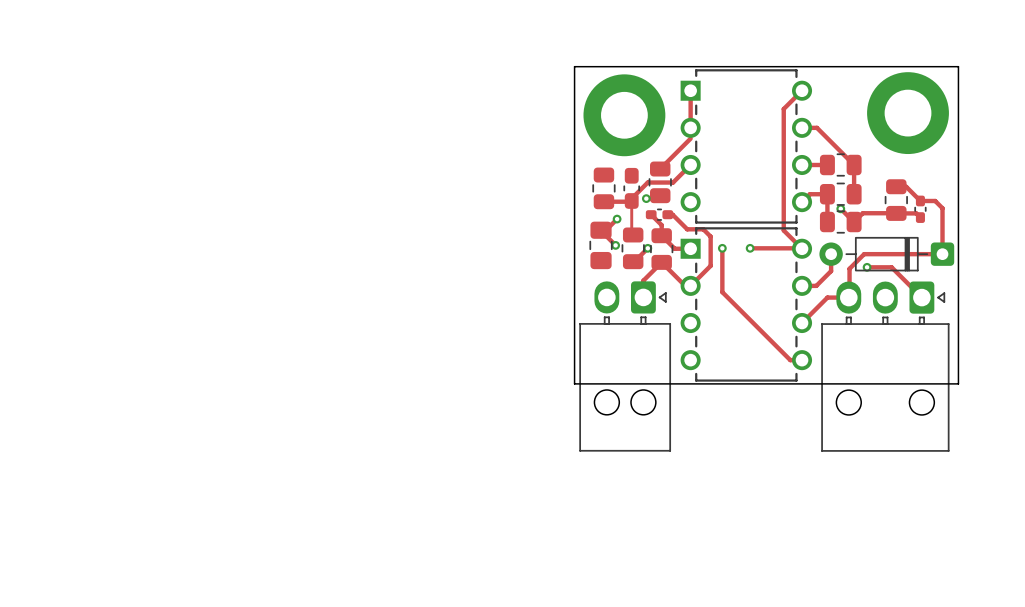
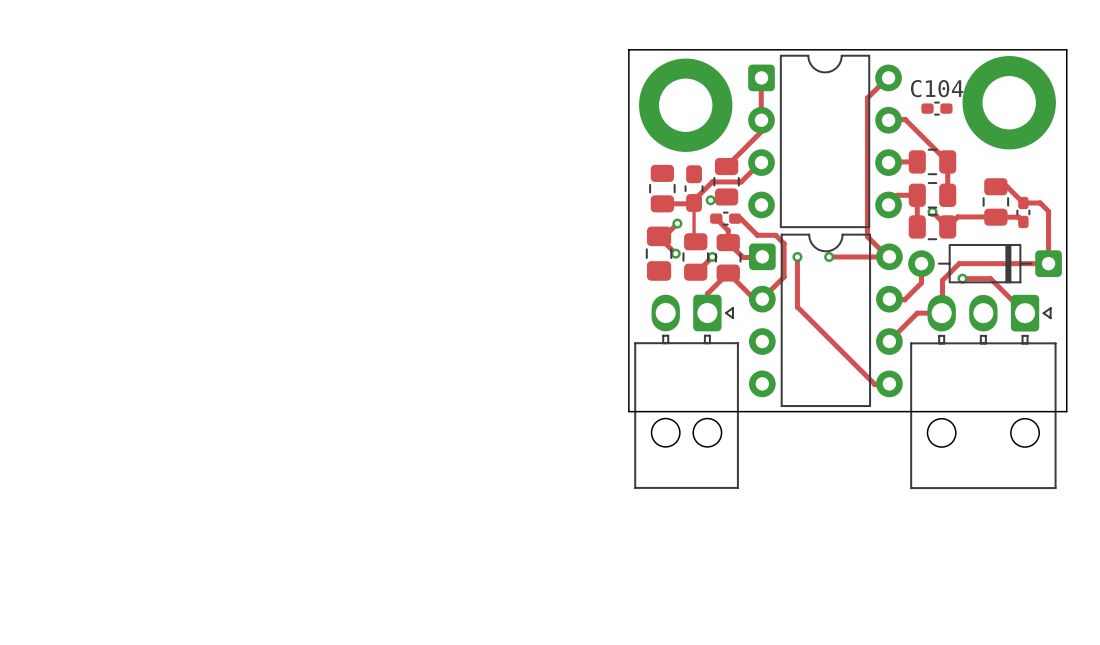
part footprint: [680, 69, 813, 224] -> [748, 54, 902, 229]
C104: none -> (936, 108)
part footprint: [680, 227, 813, 382] -> [749, 233, 903, 408]

